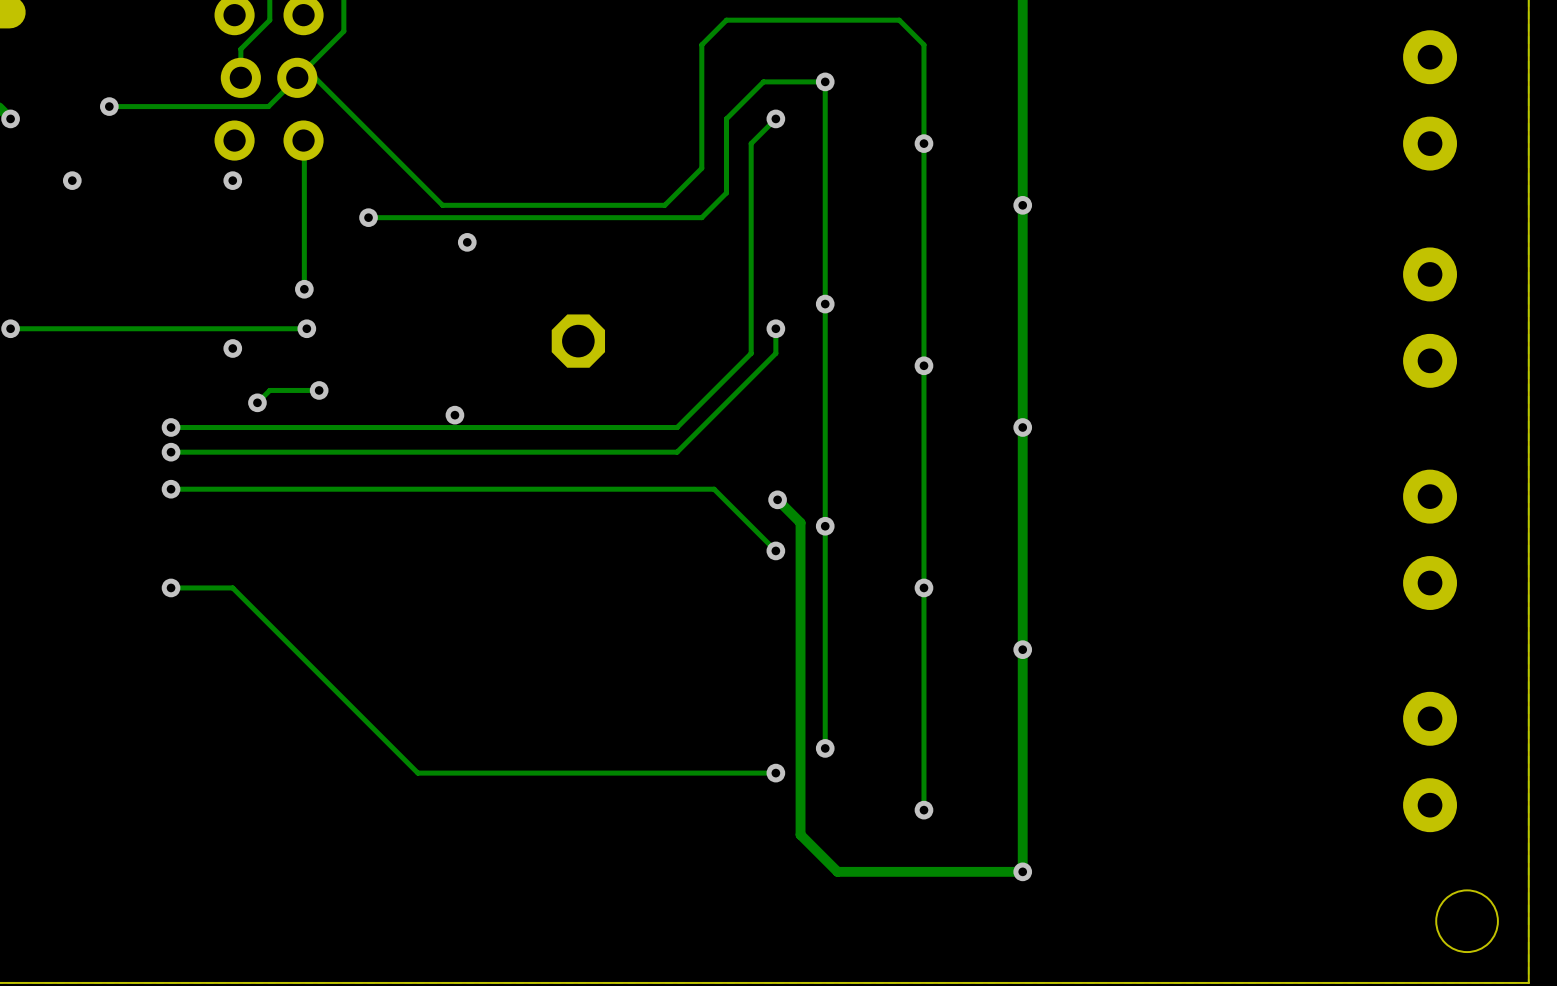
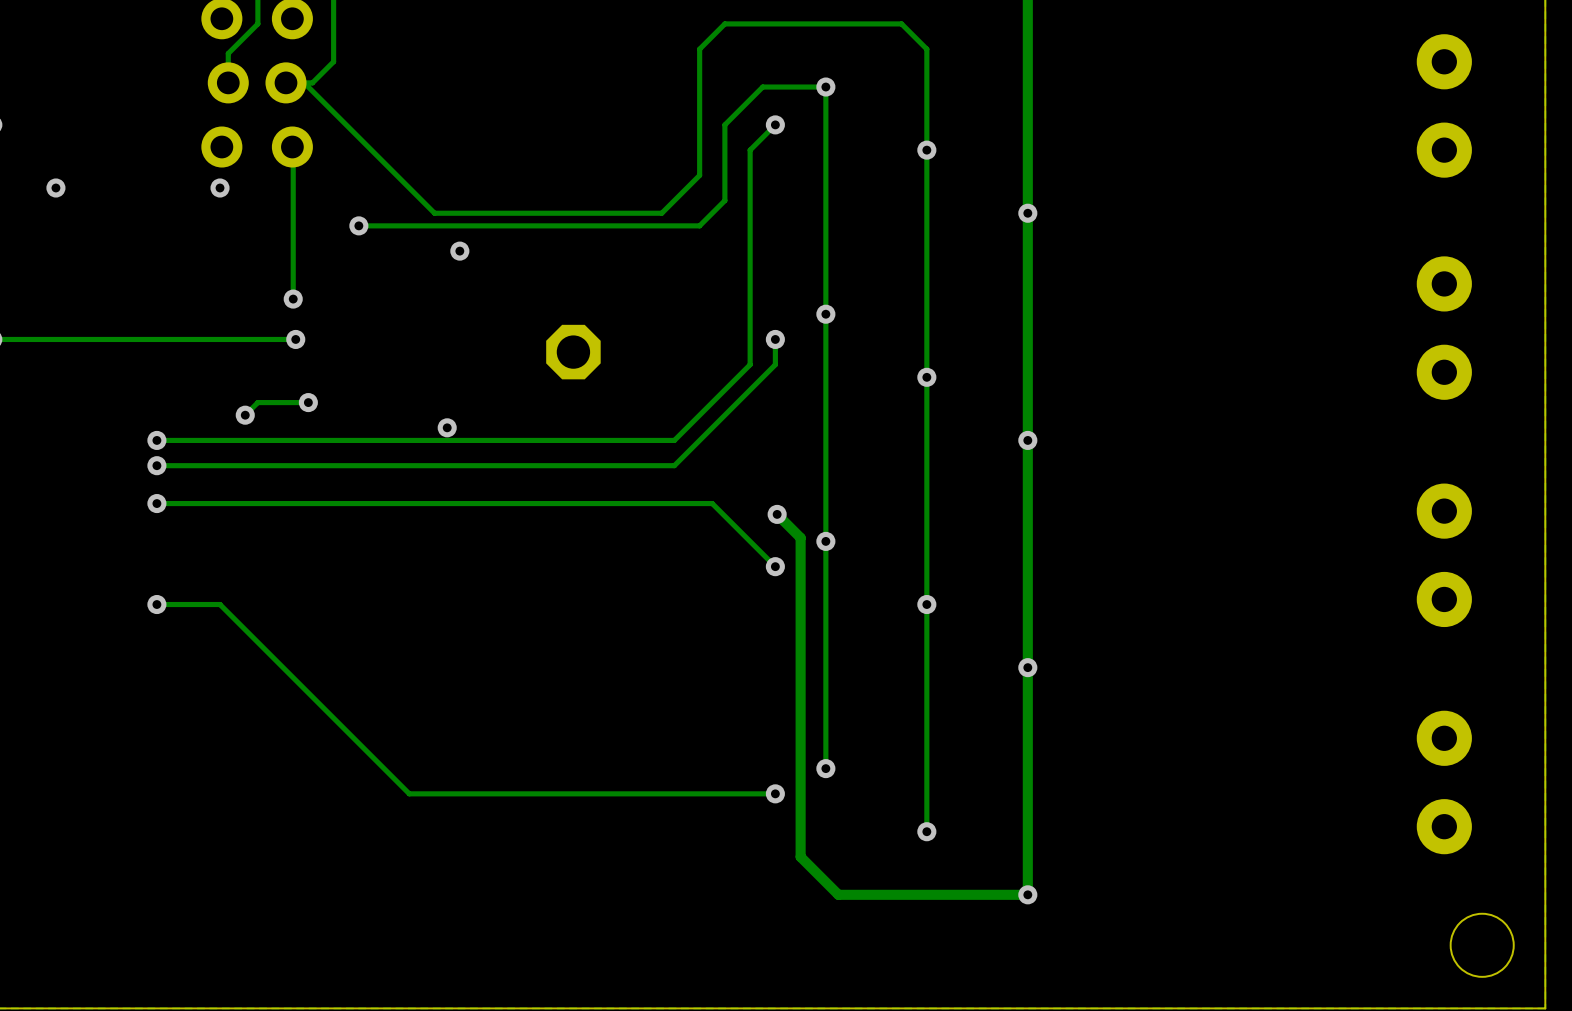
track: (343, 31) (268, 106) (109, 106) -> (333, 35) (333, 61) (312, 82) (304, 82)
via: (109, 106) -> none
via: (232, 348) -> none

